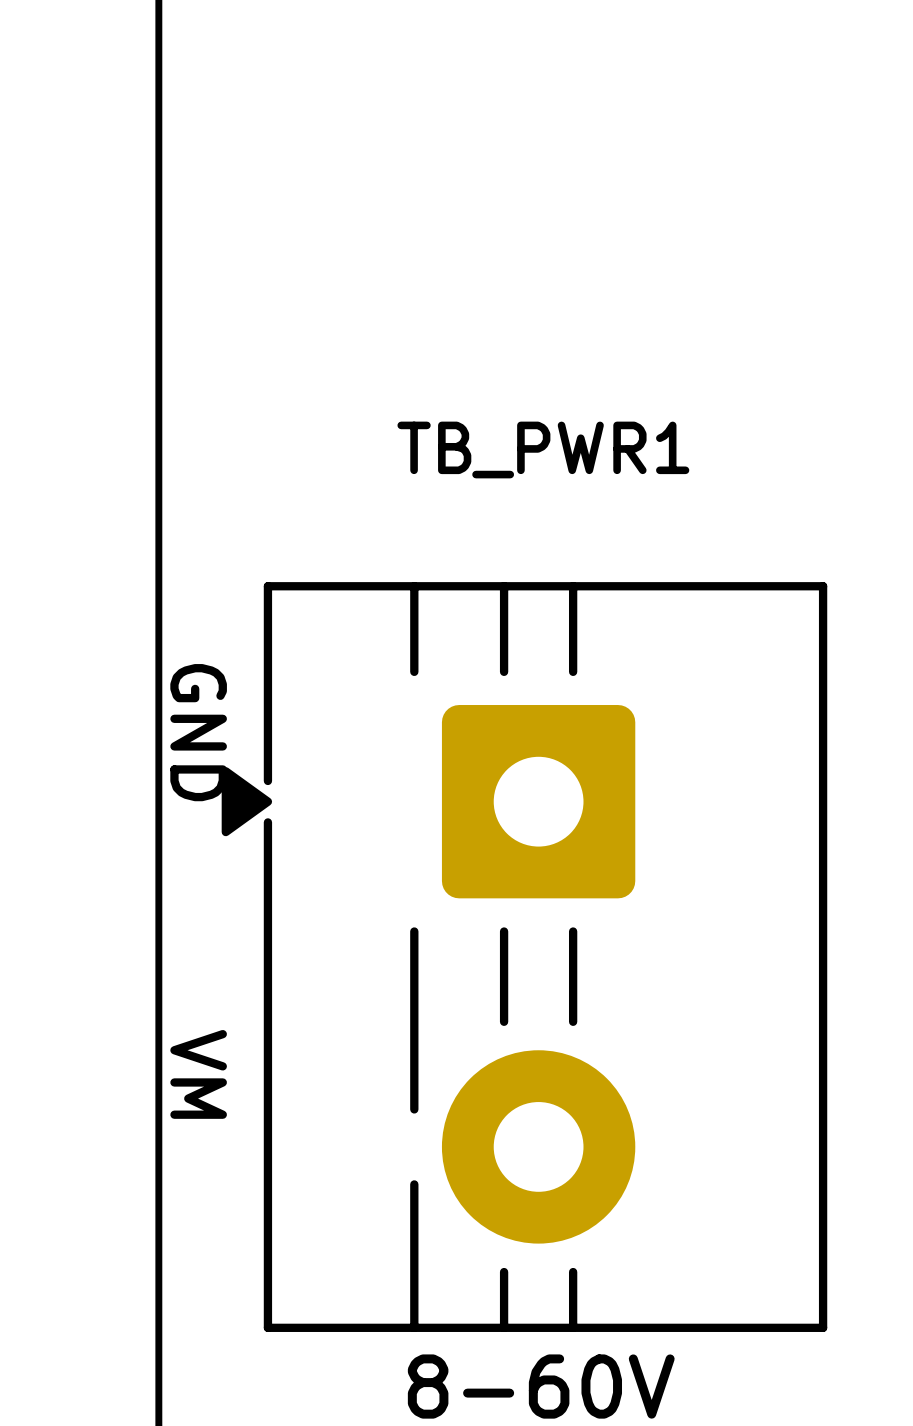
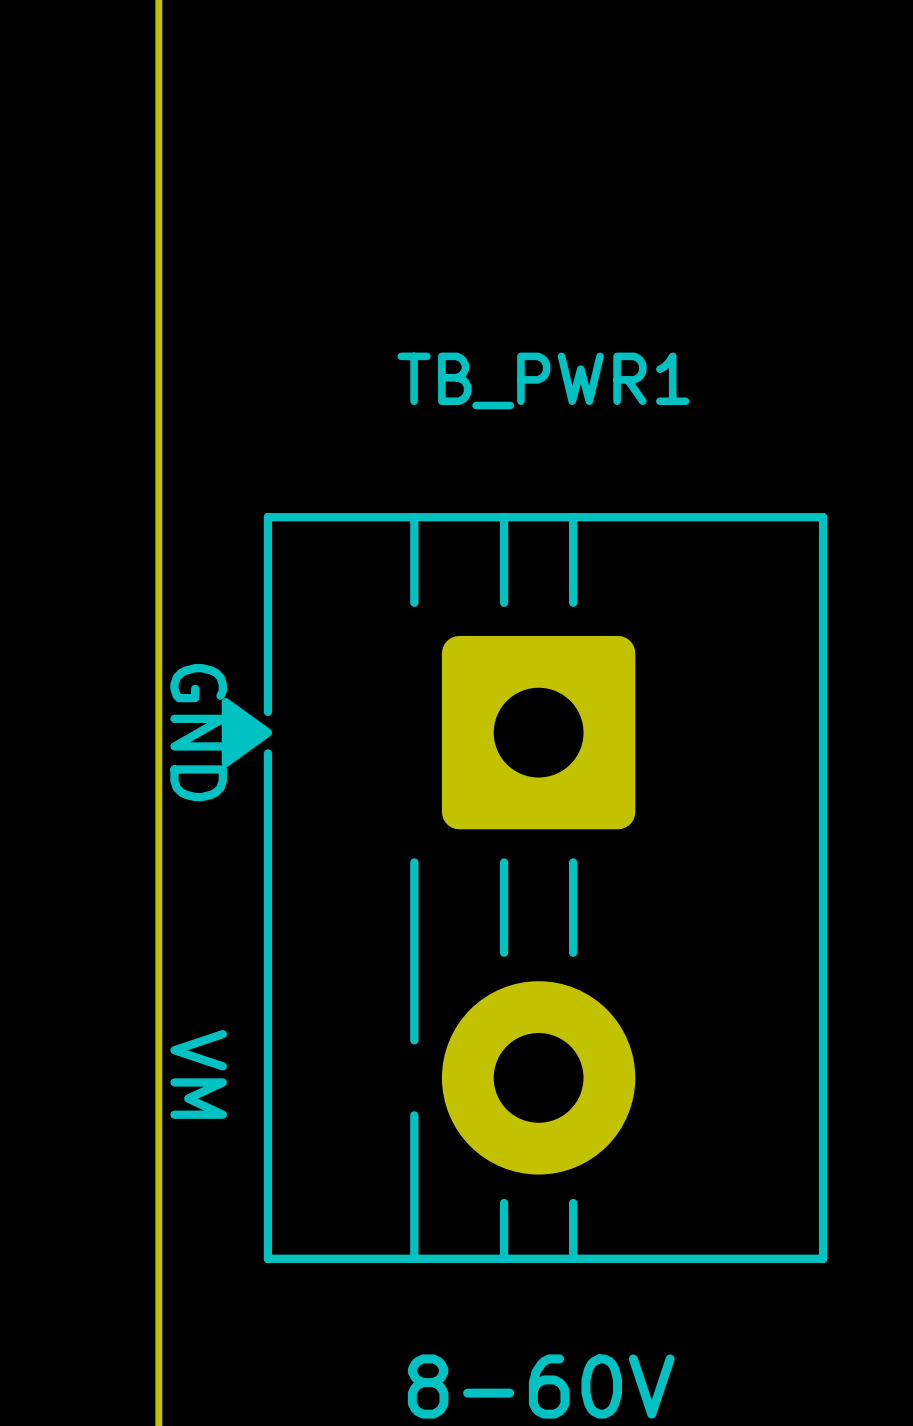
TB_PWR1 position: (524, 957) -> (524, 887)

